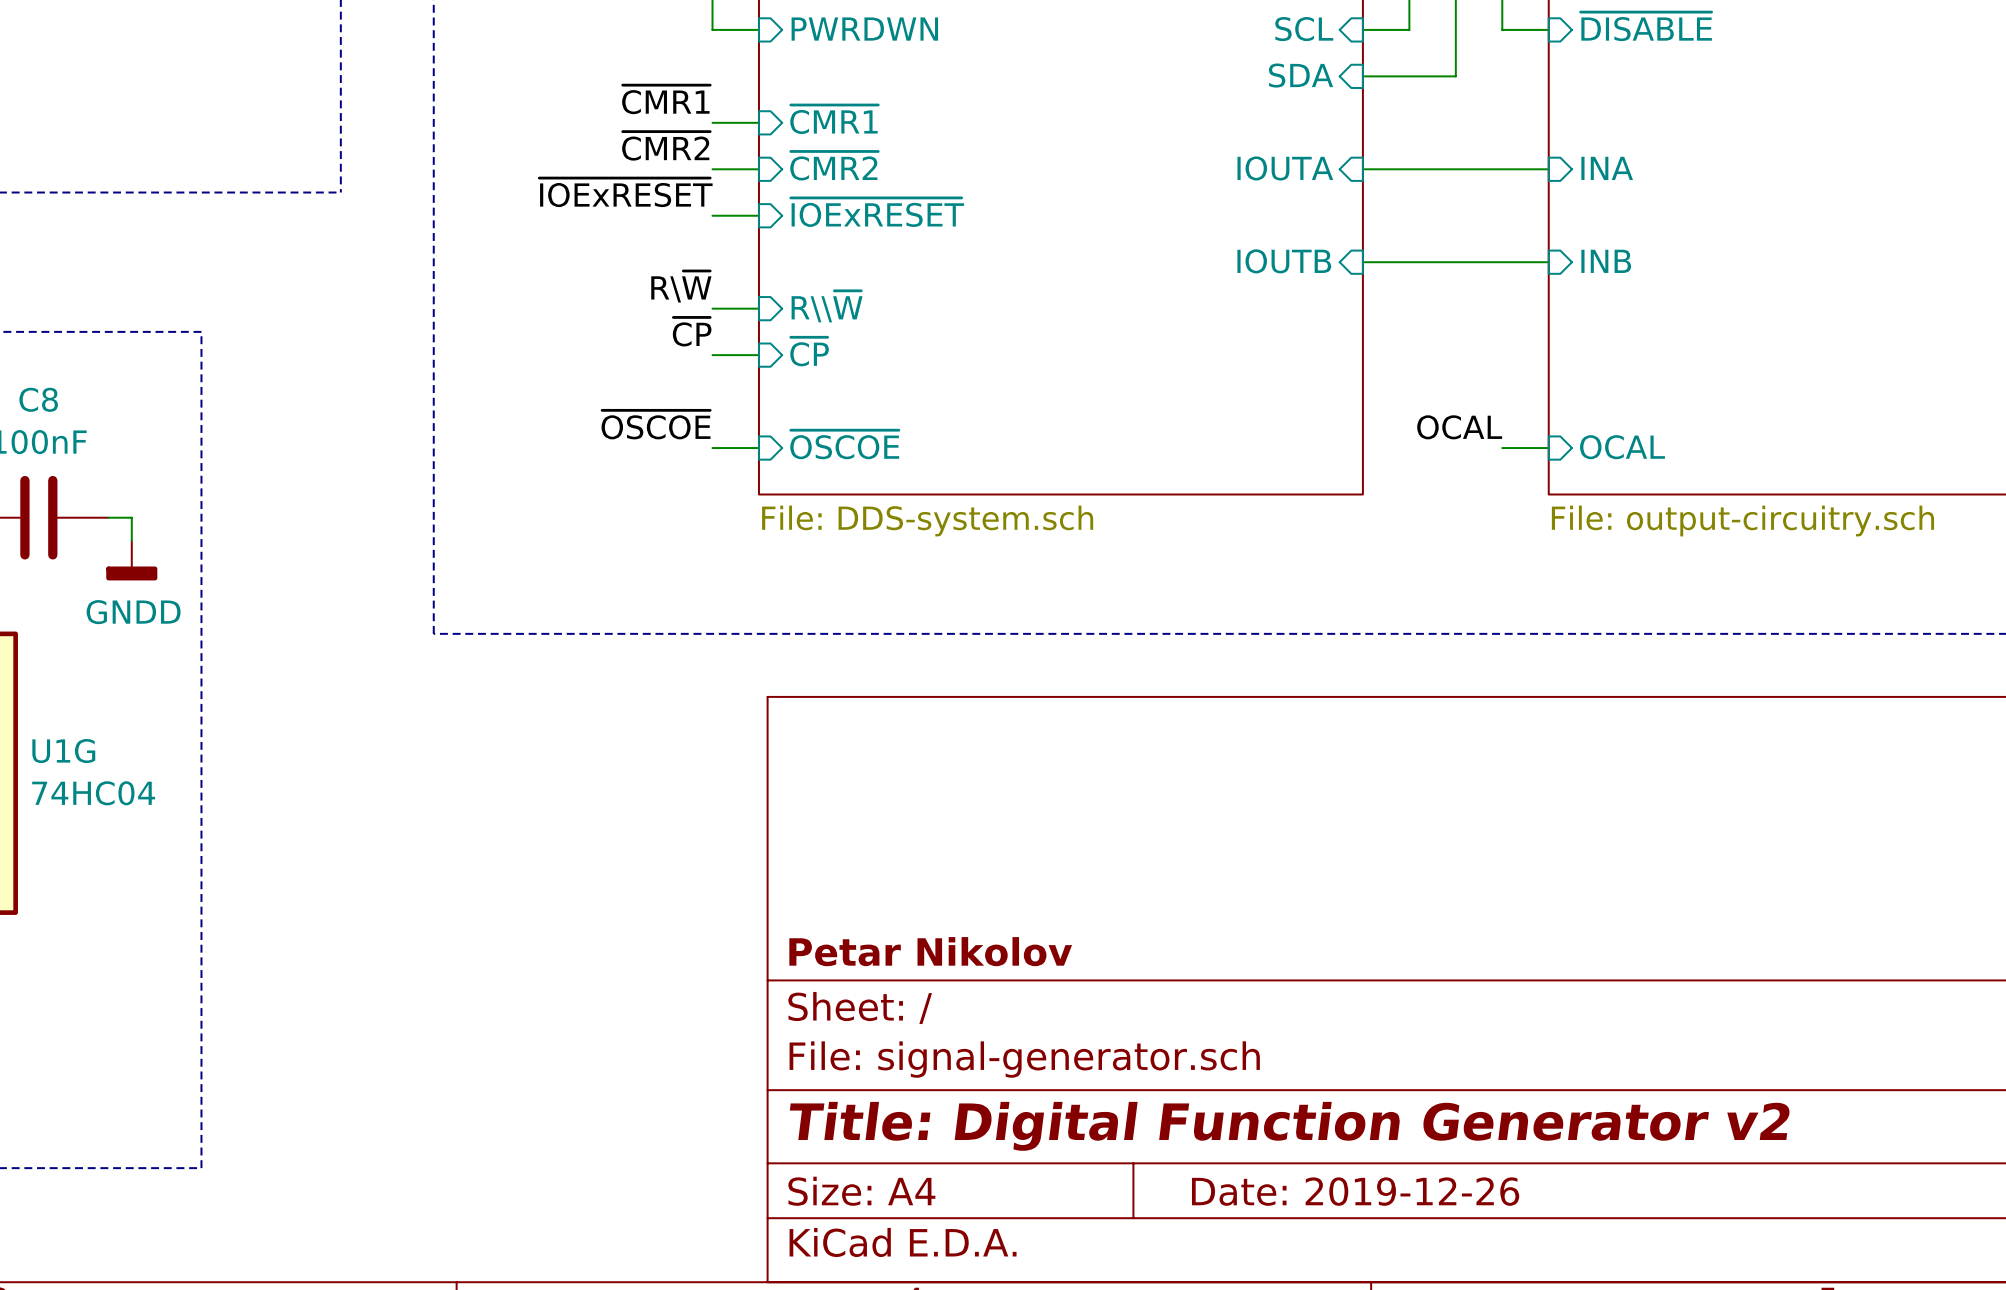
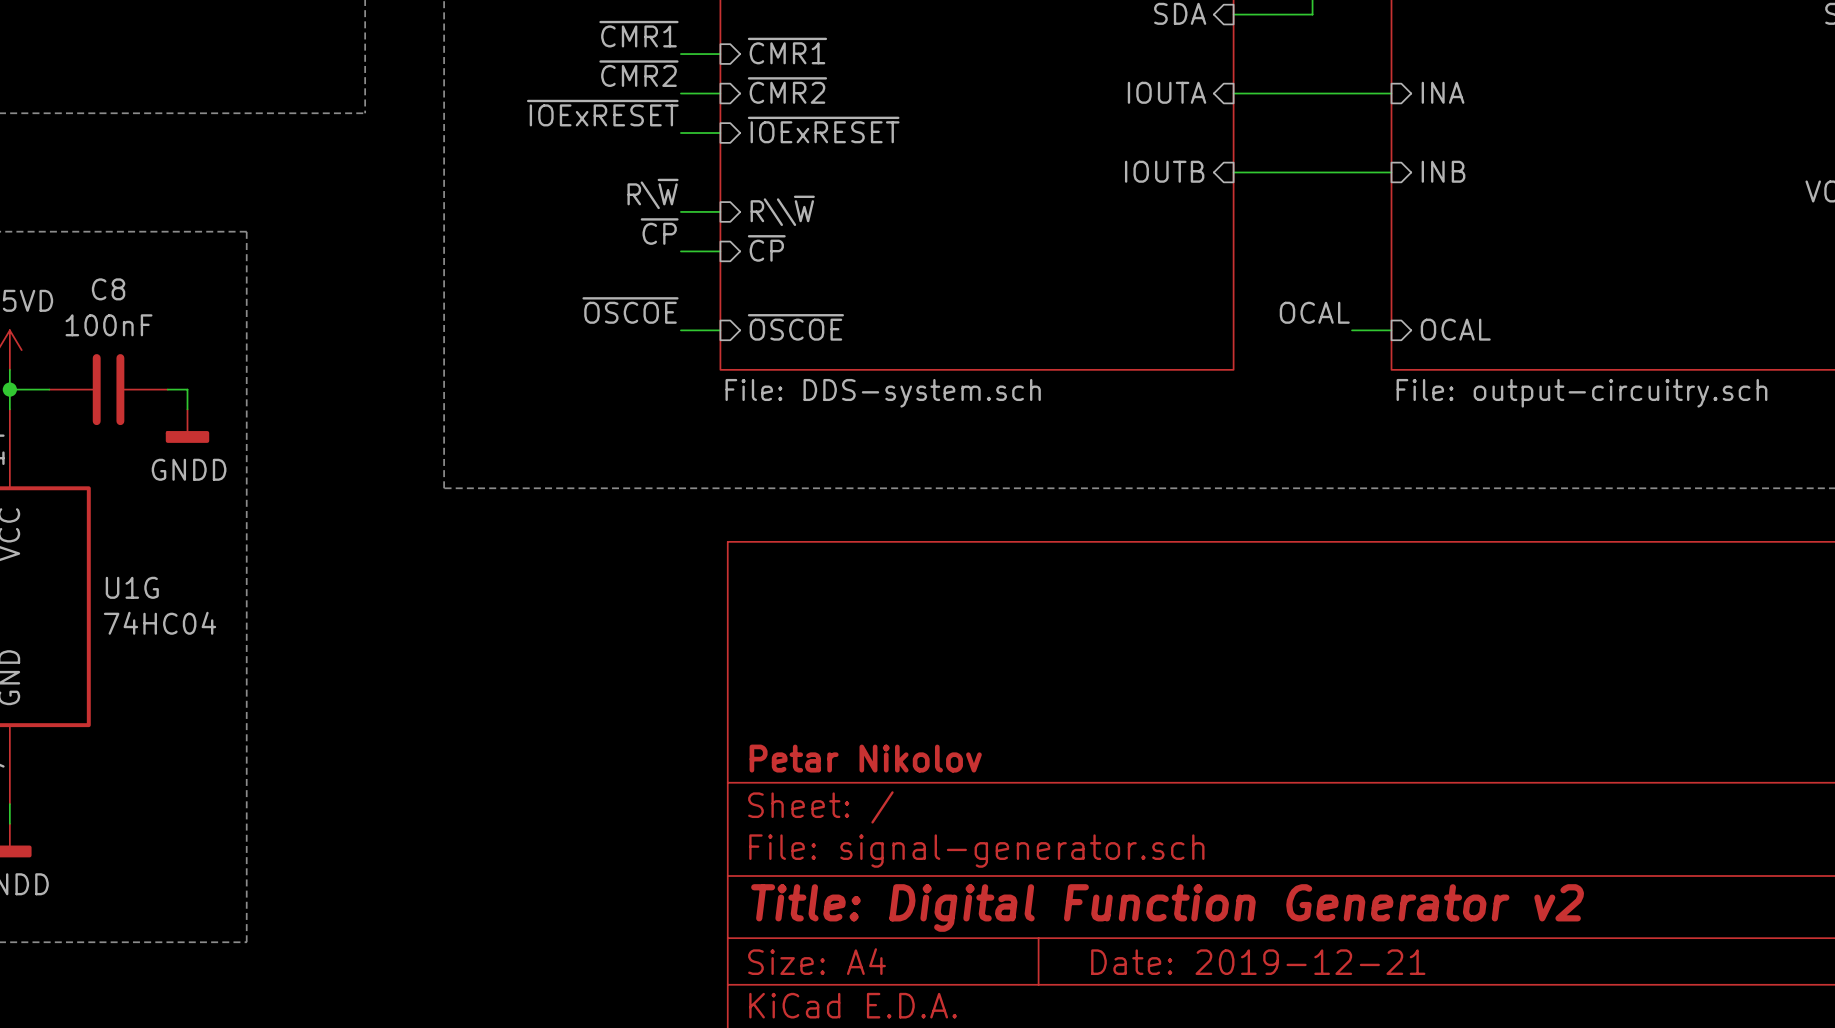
title block: Date: 2019-12-26 (1355, 1191) -> Date: 2019-12-21 (1258, 962)

